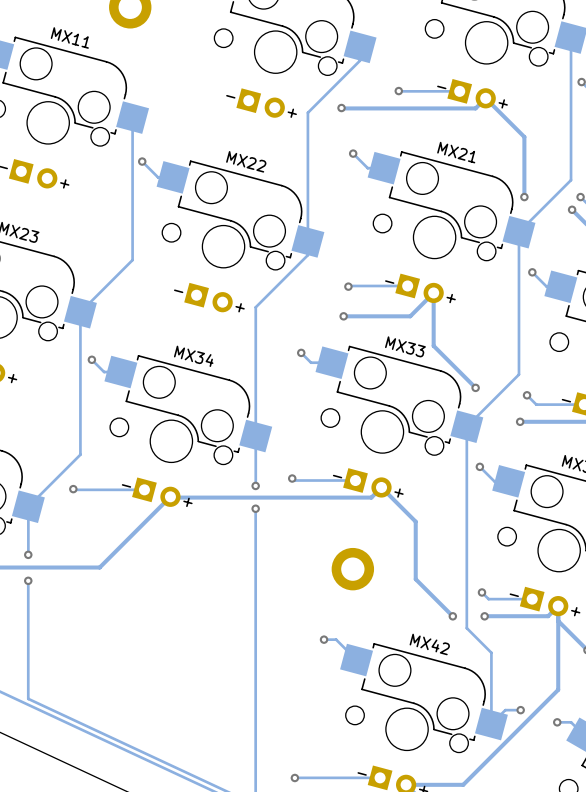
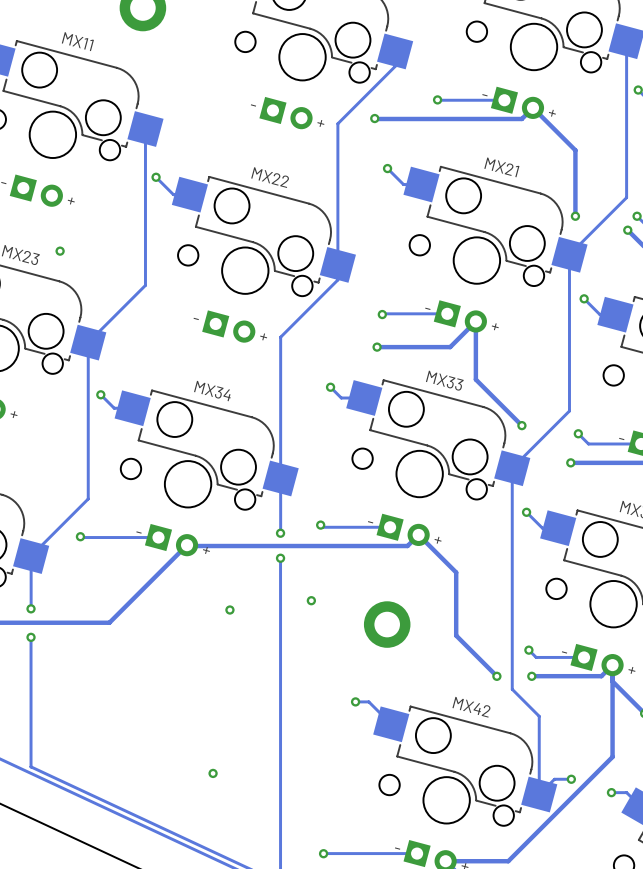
via: none -> (60, 251)
via: none -> (311, 600)
via: none -> (229, 610)
via: none -> (213, 773)

